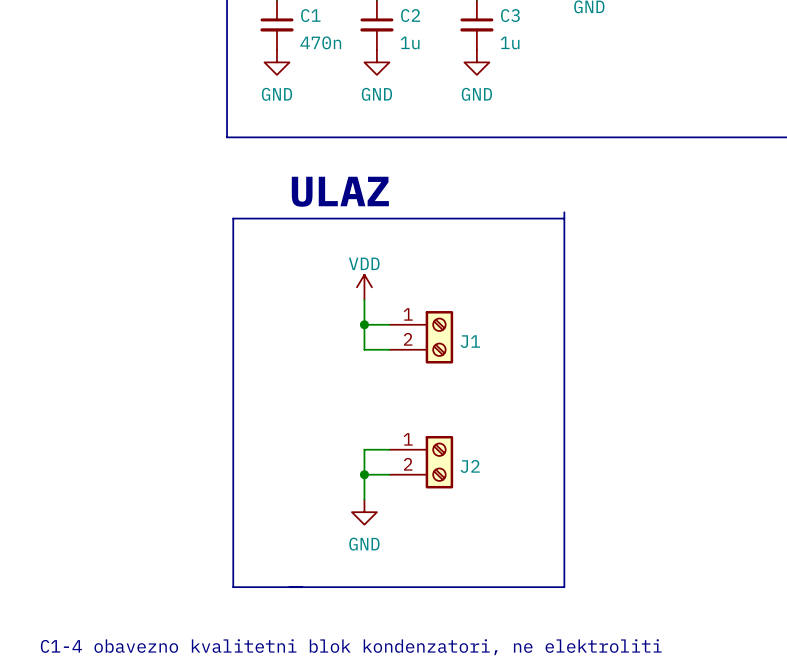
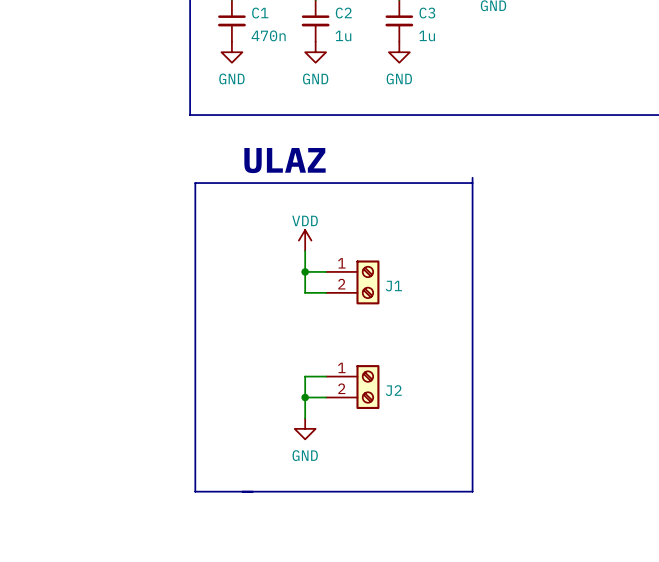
text: C1-4 obavezno kvalitetni blok kondenzatori, ne elektroliti (351, 647) -> none

